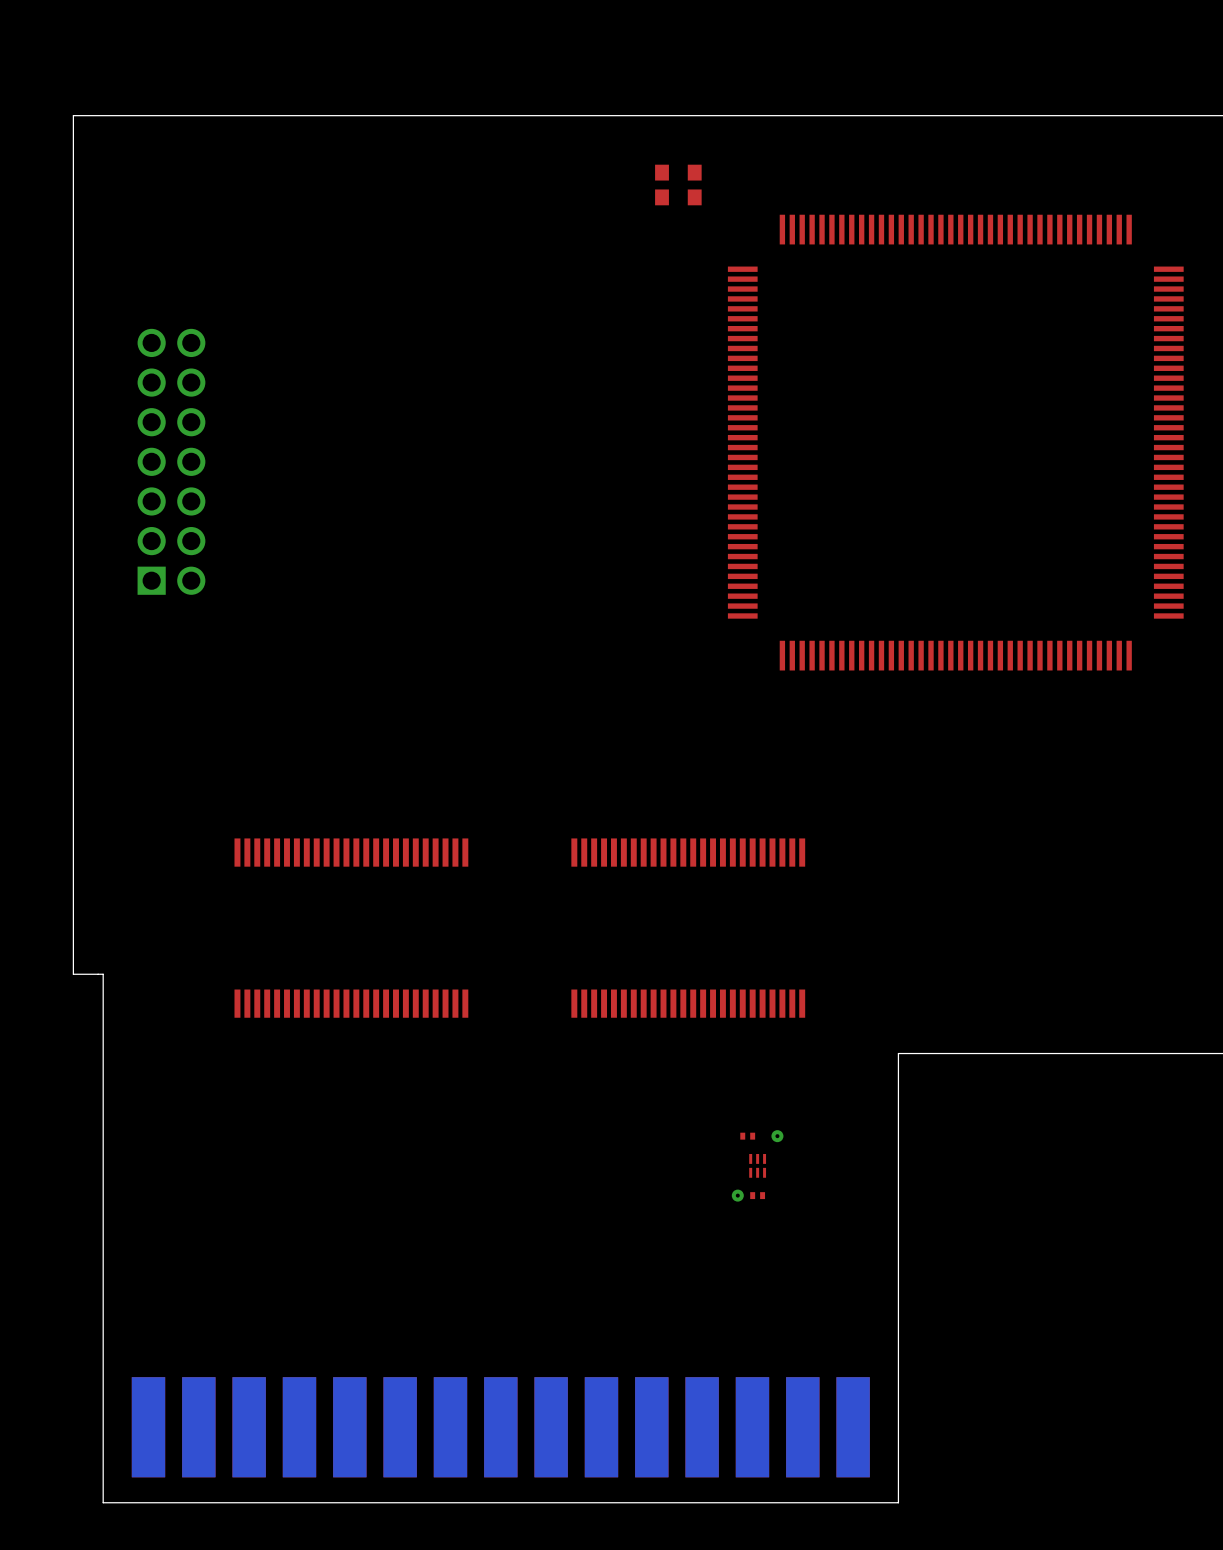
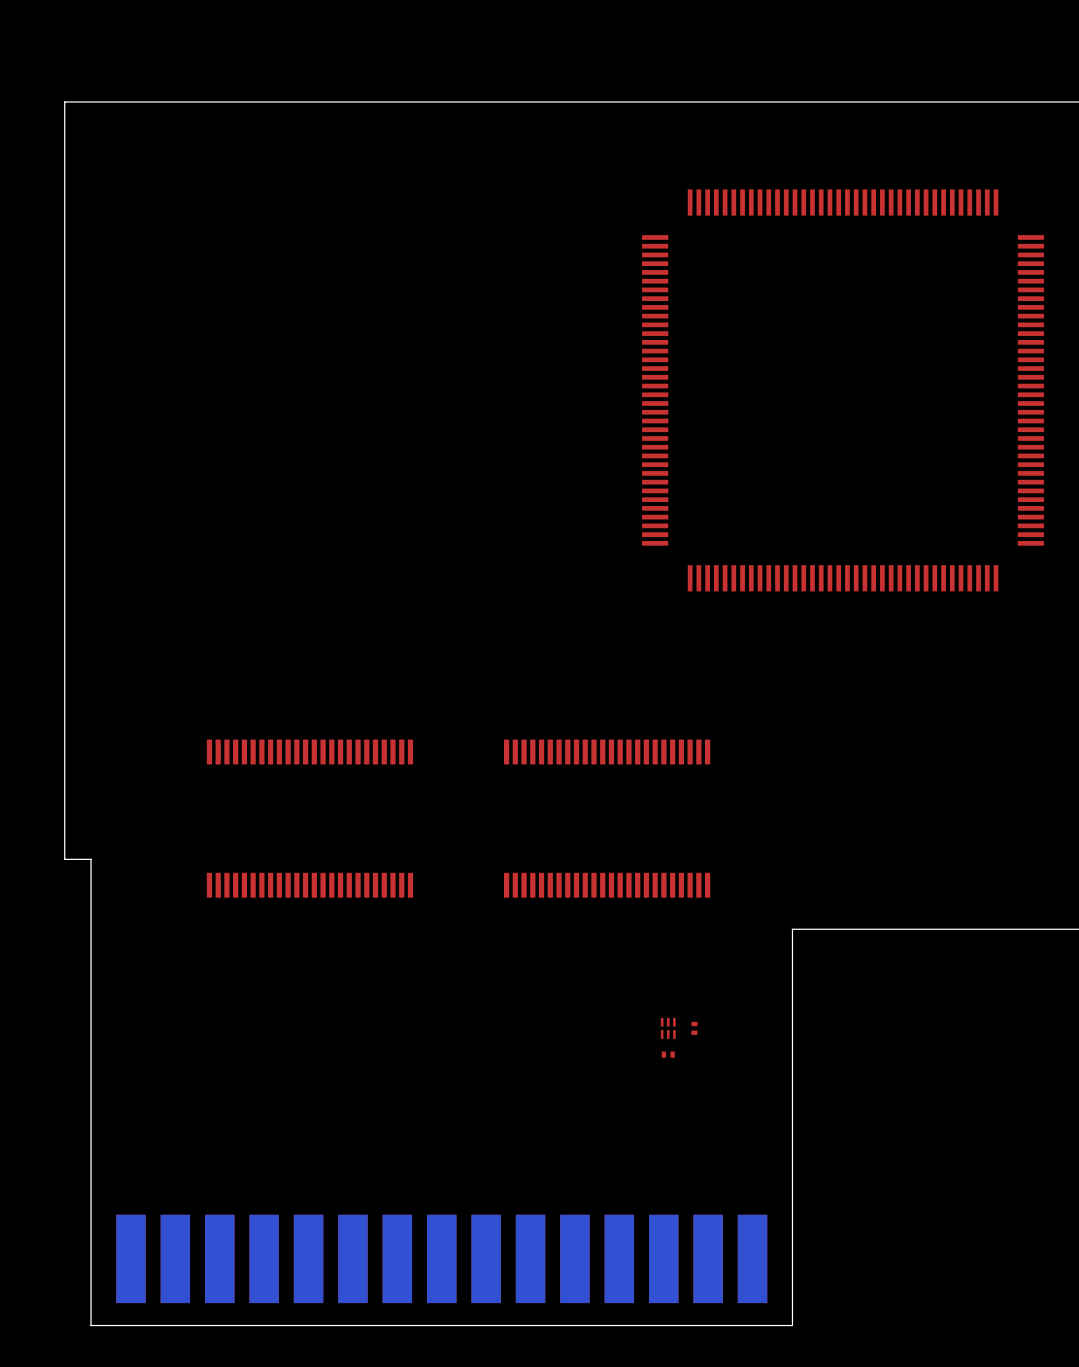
part: (678, 185) -> none
part: (171, 461) -> none
part rotation: 0° (747, 1136) -> 90° clockwise (694, 1028)
part position: (747, 1136) -> (694, 1028)
via: (777, 1136) -> none
via: (737, 1195) -> none

